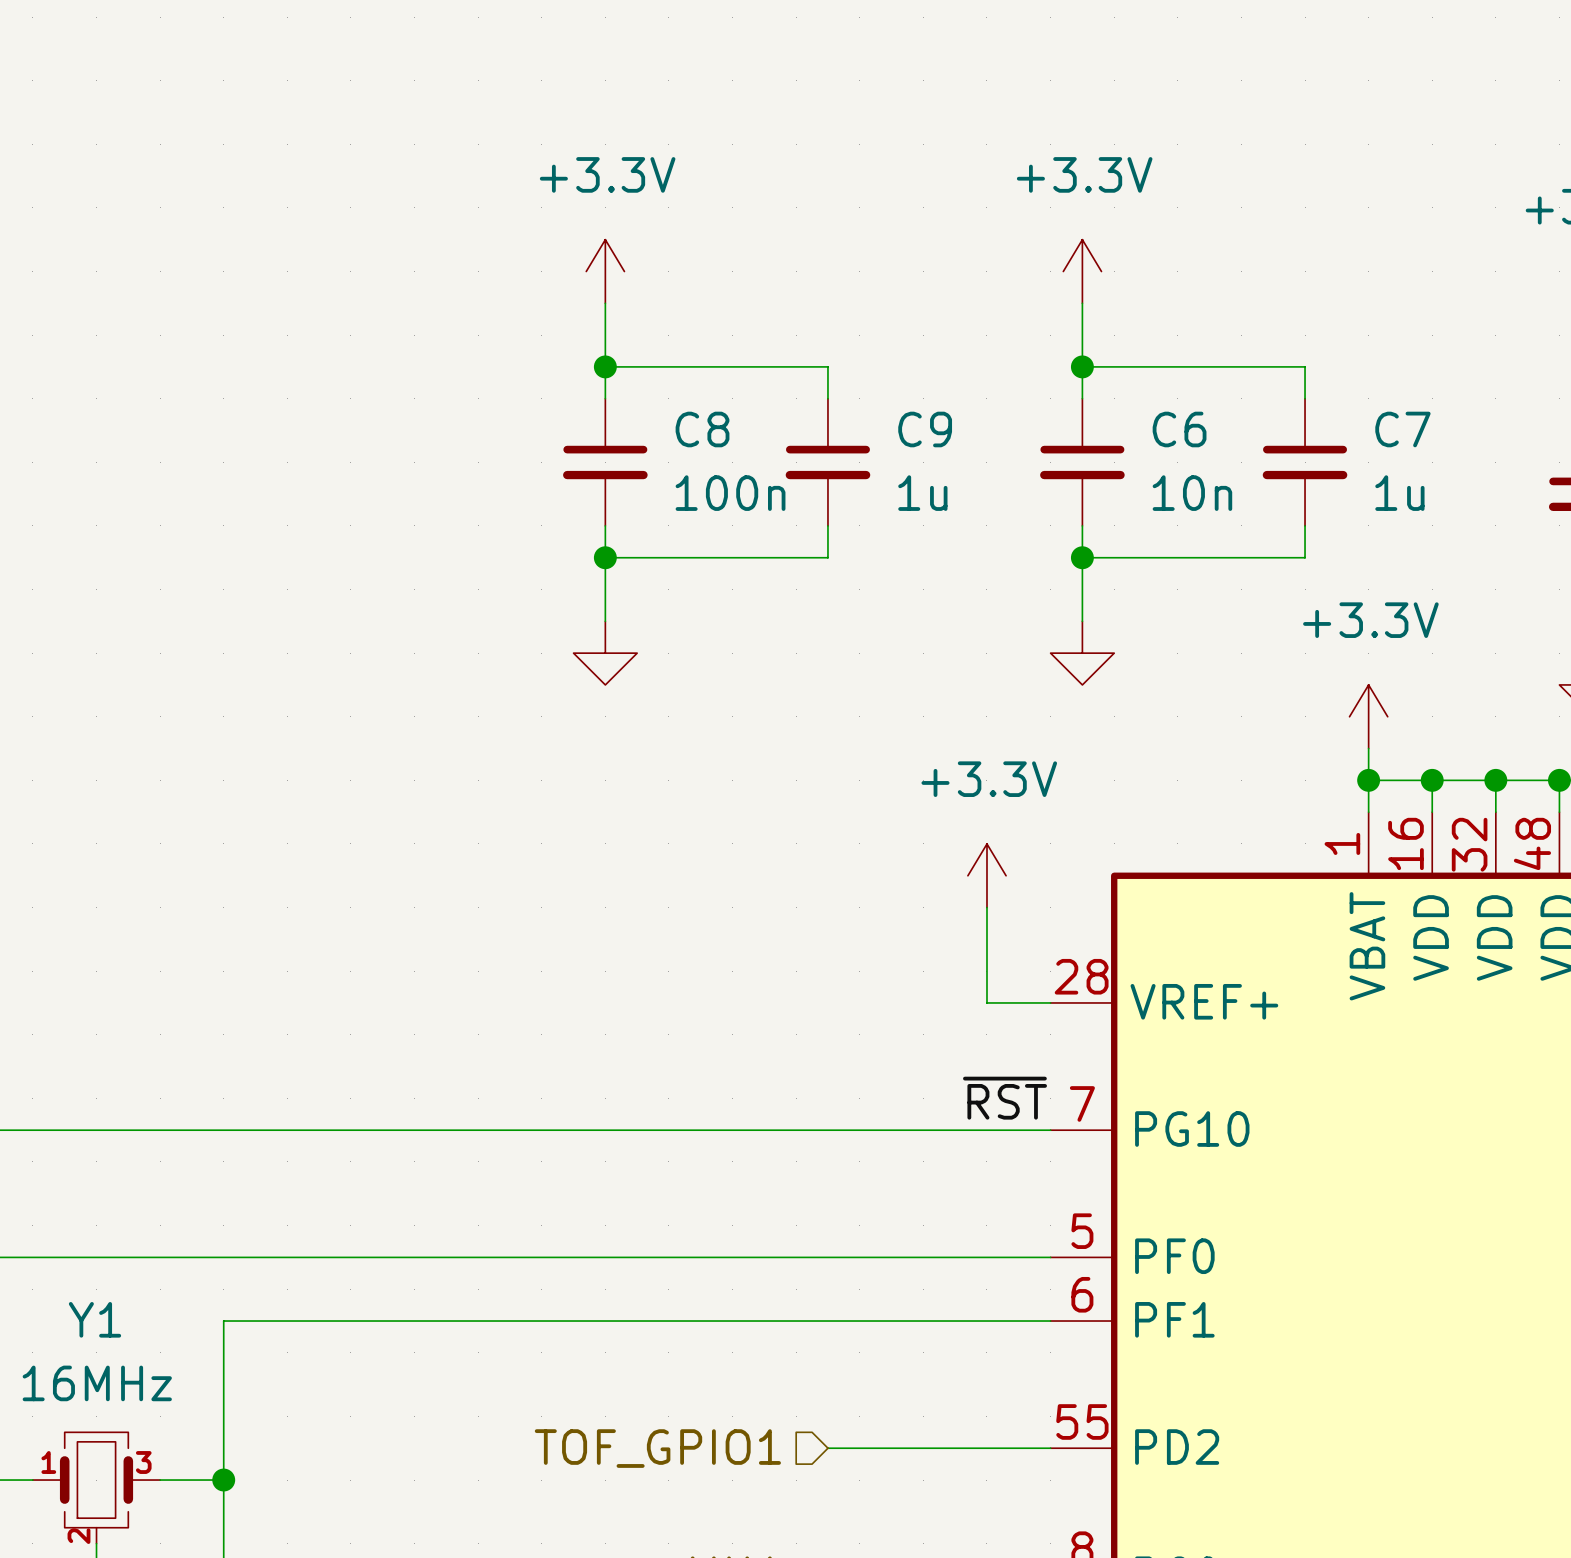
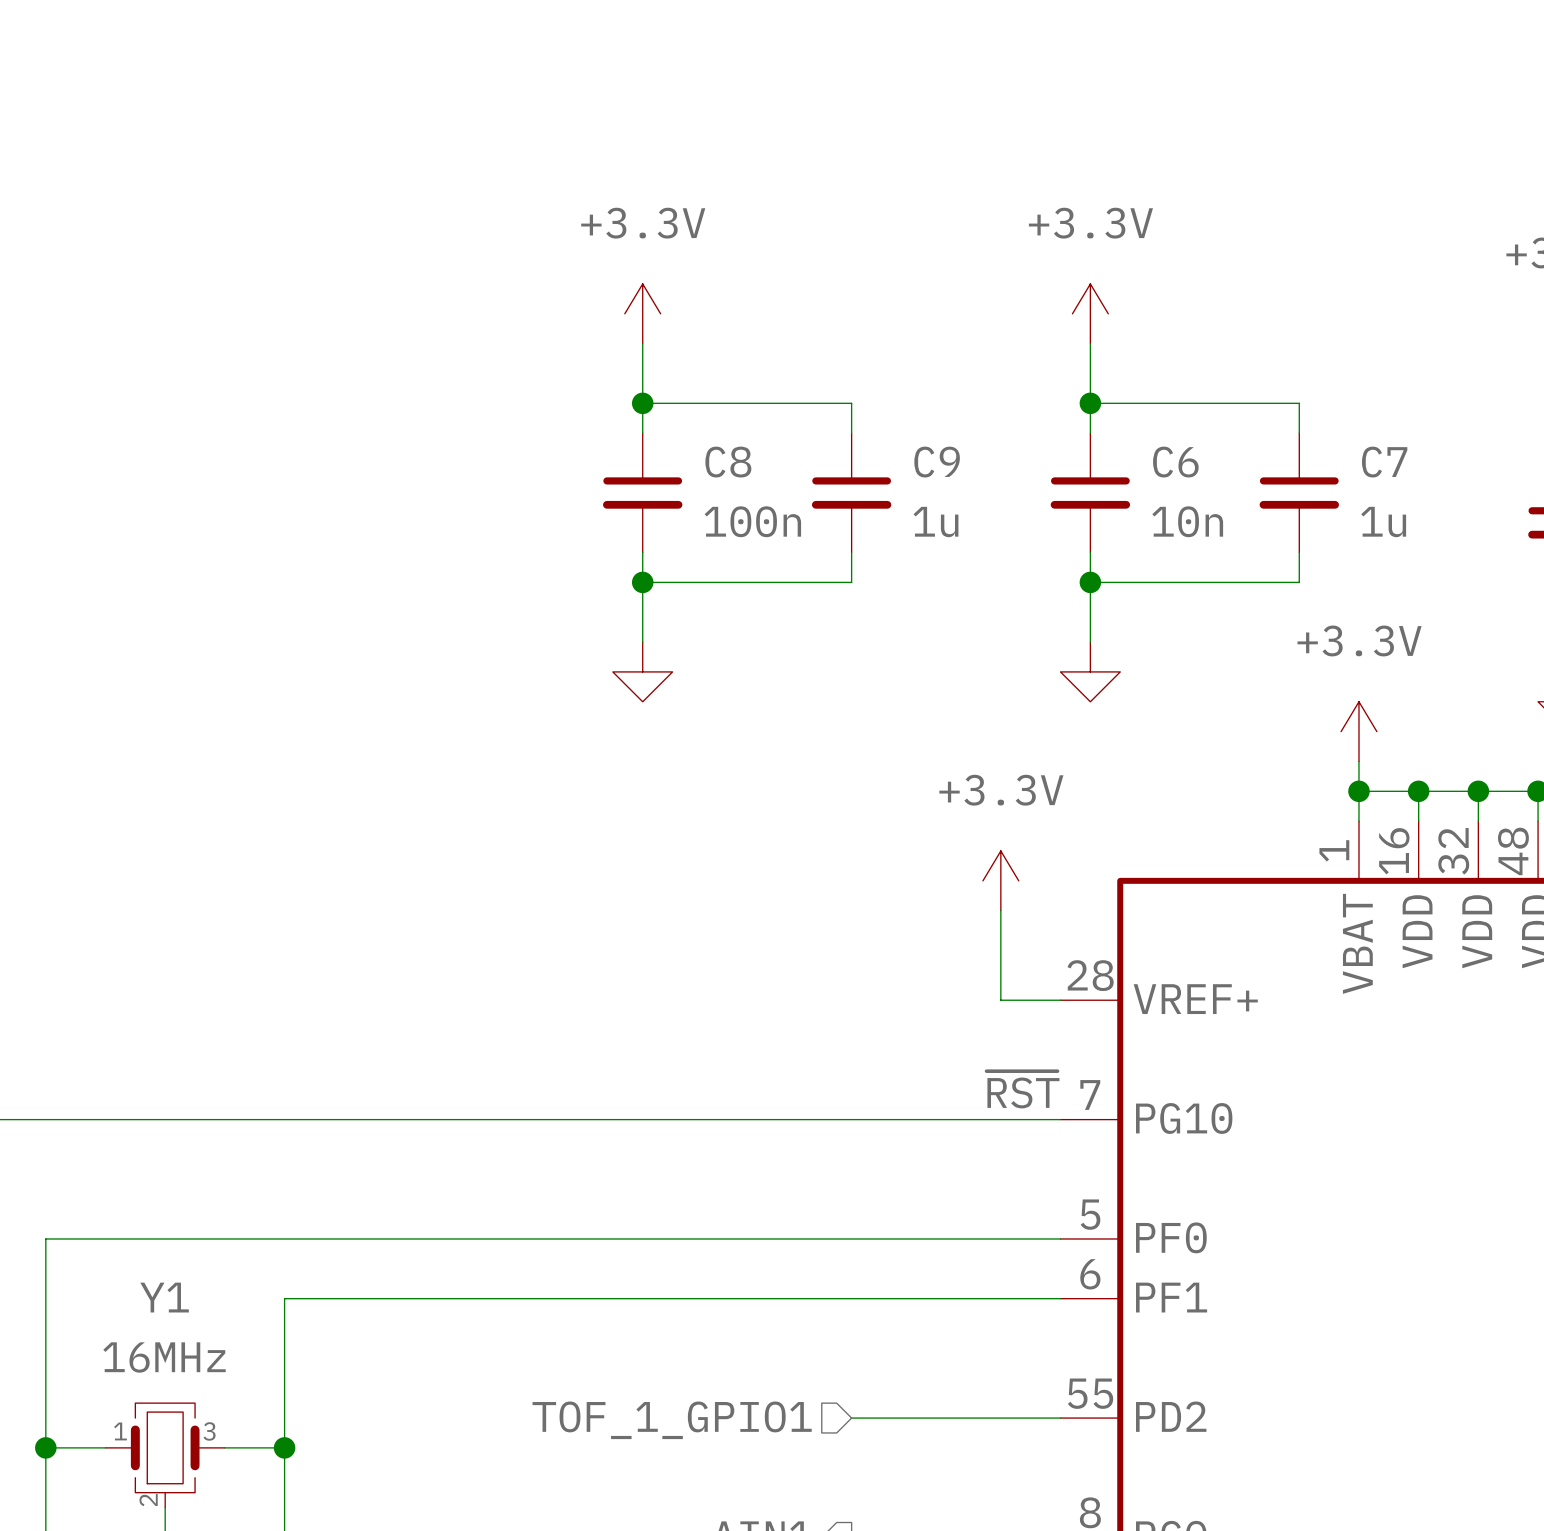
hierarchical label: TOF_GPIO1 (657, 1448) -> TOF_1_GPIO1 (672, 1420)

